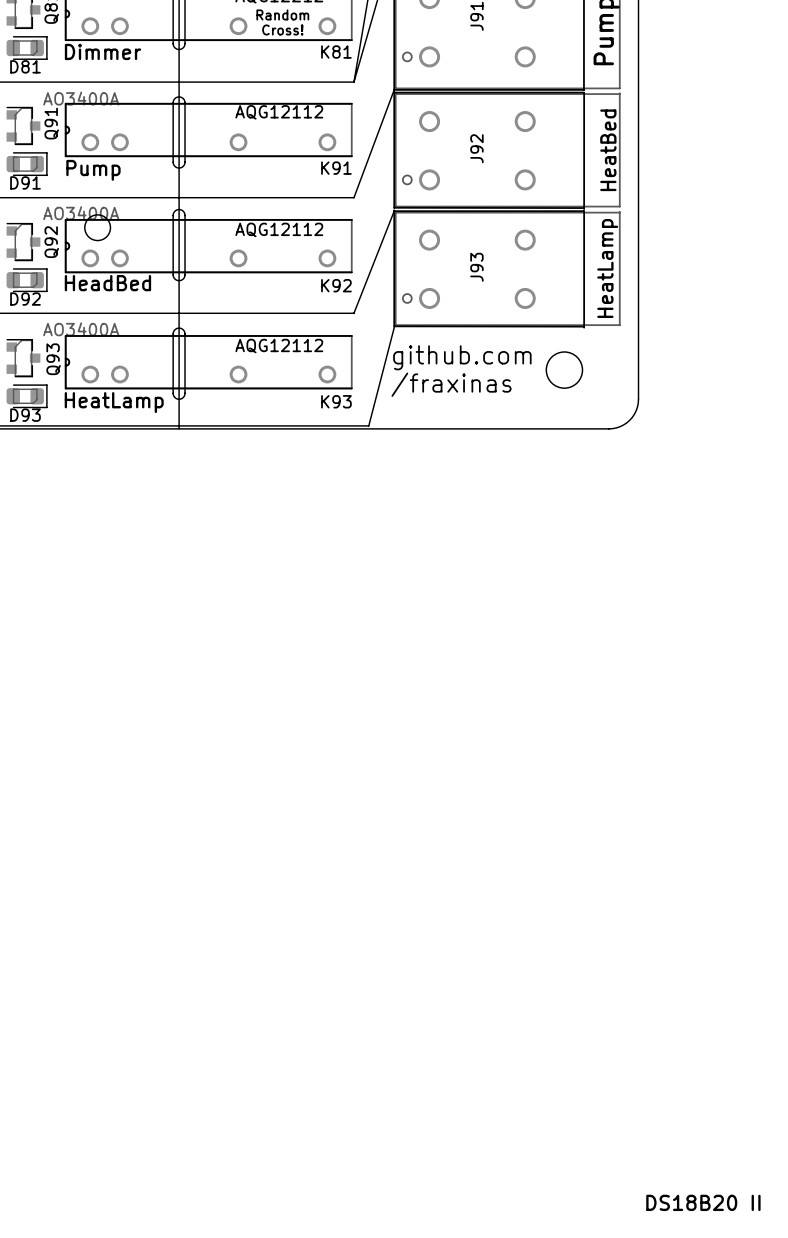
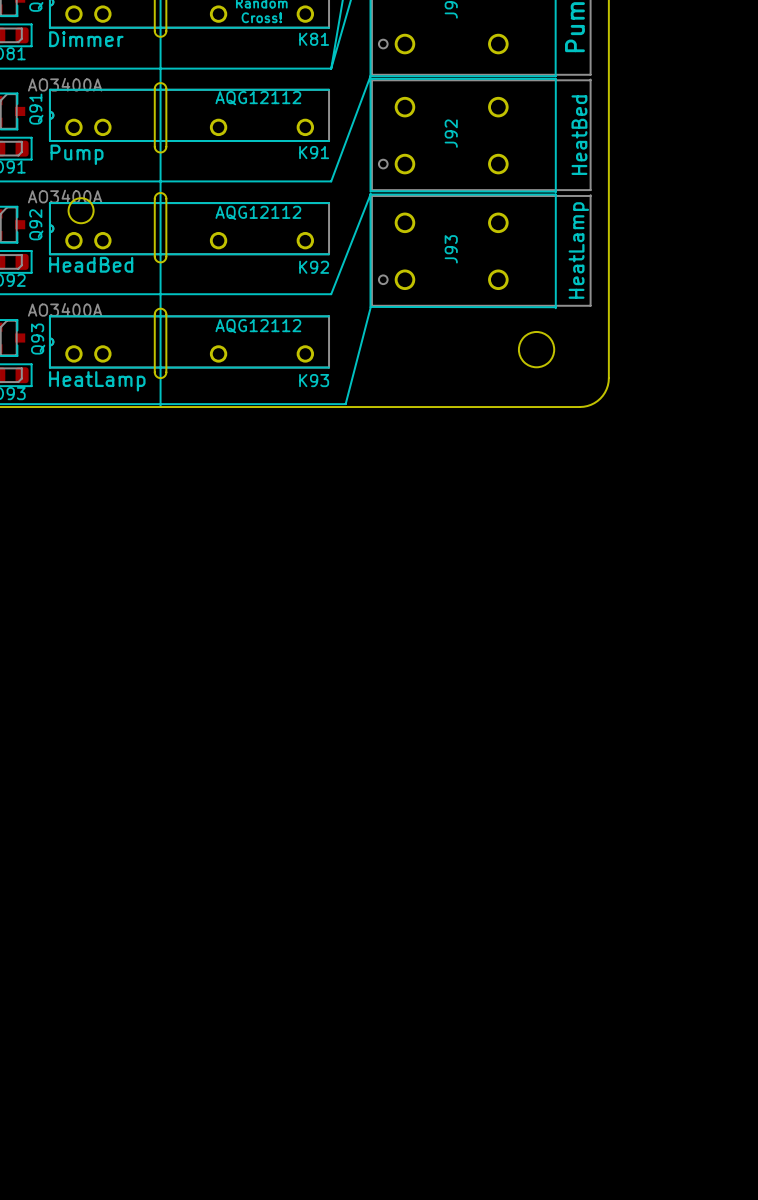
text: github.com (462, 357) -> none
text: /fraxinas (451, 384) -> none
drawing: [646, 1194, 761, 1212] -> none

